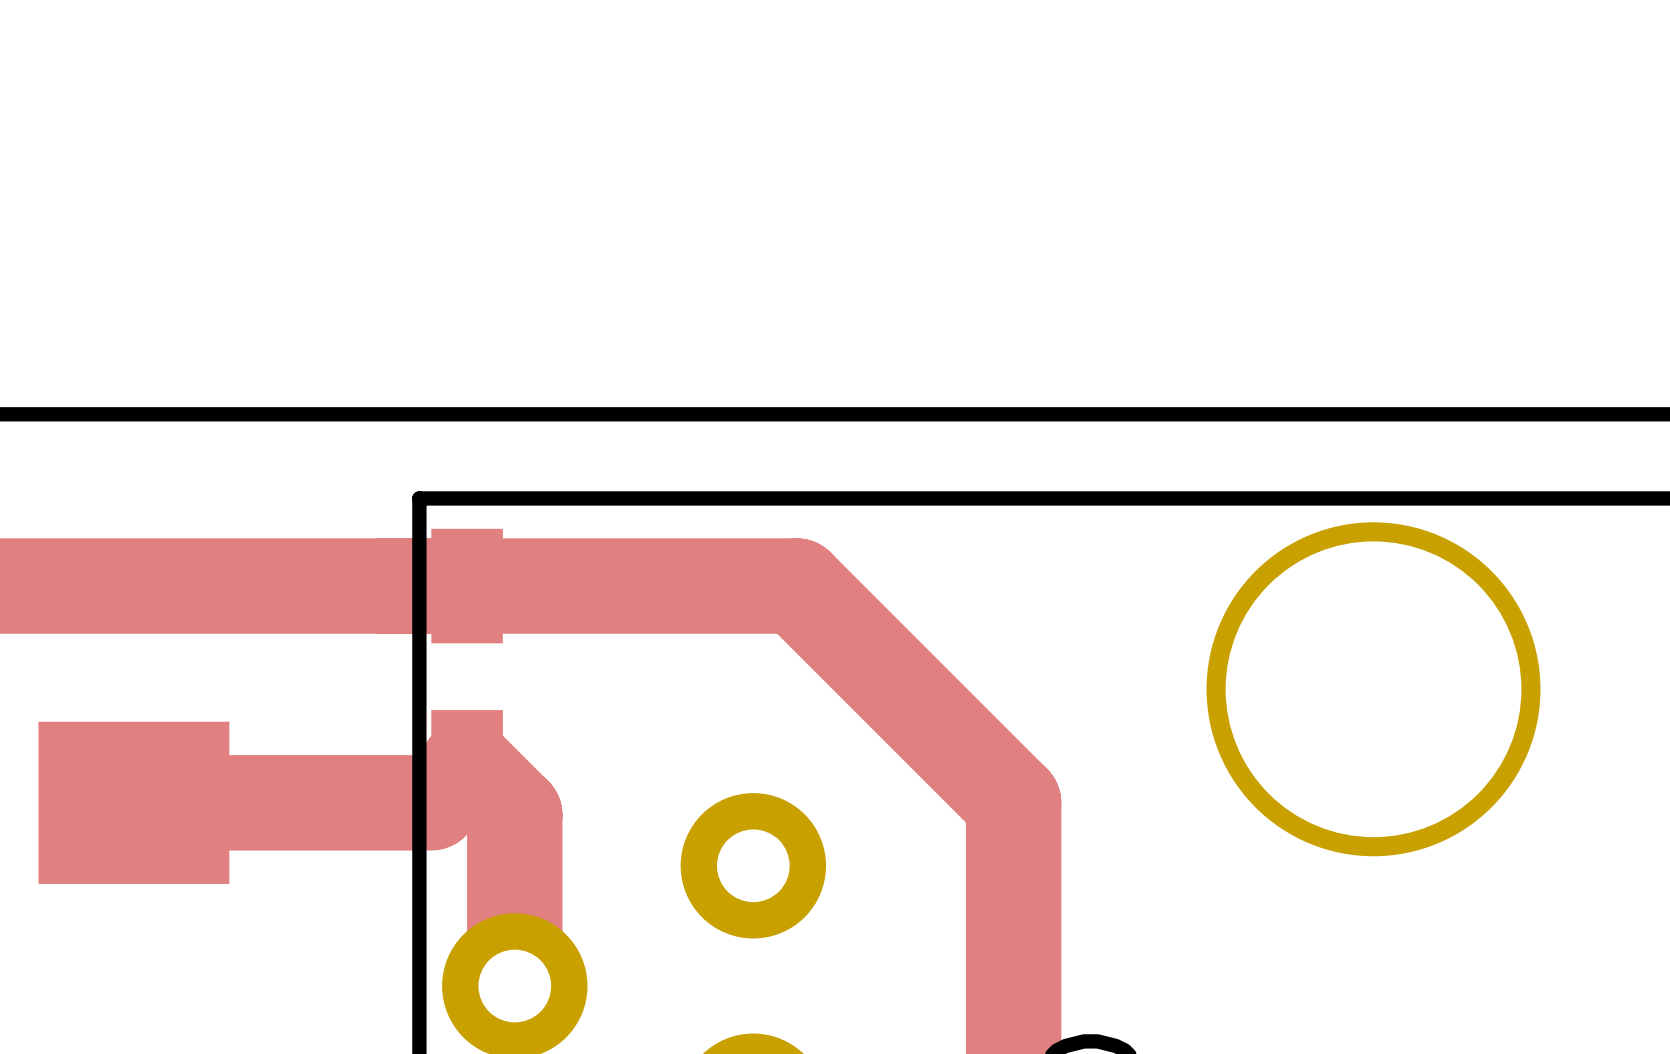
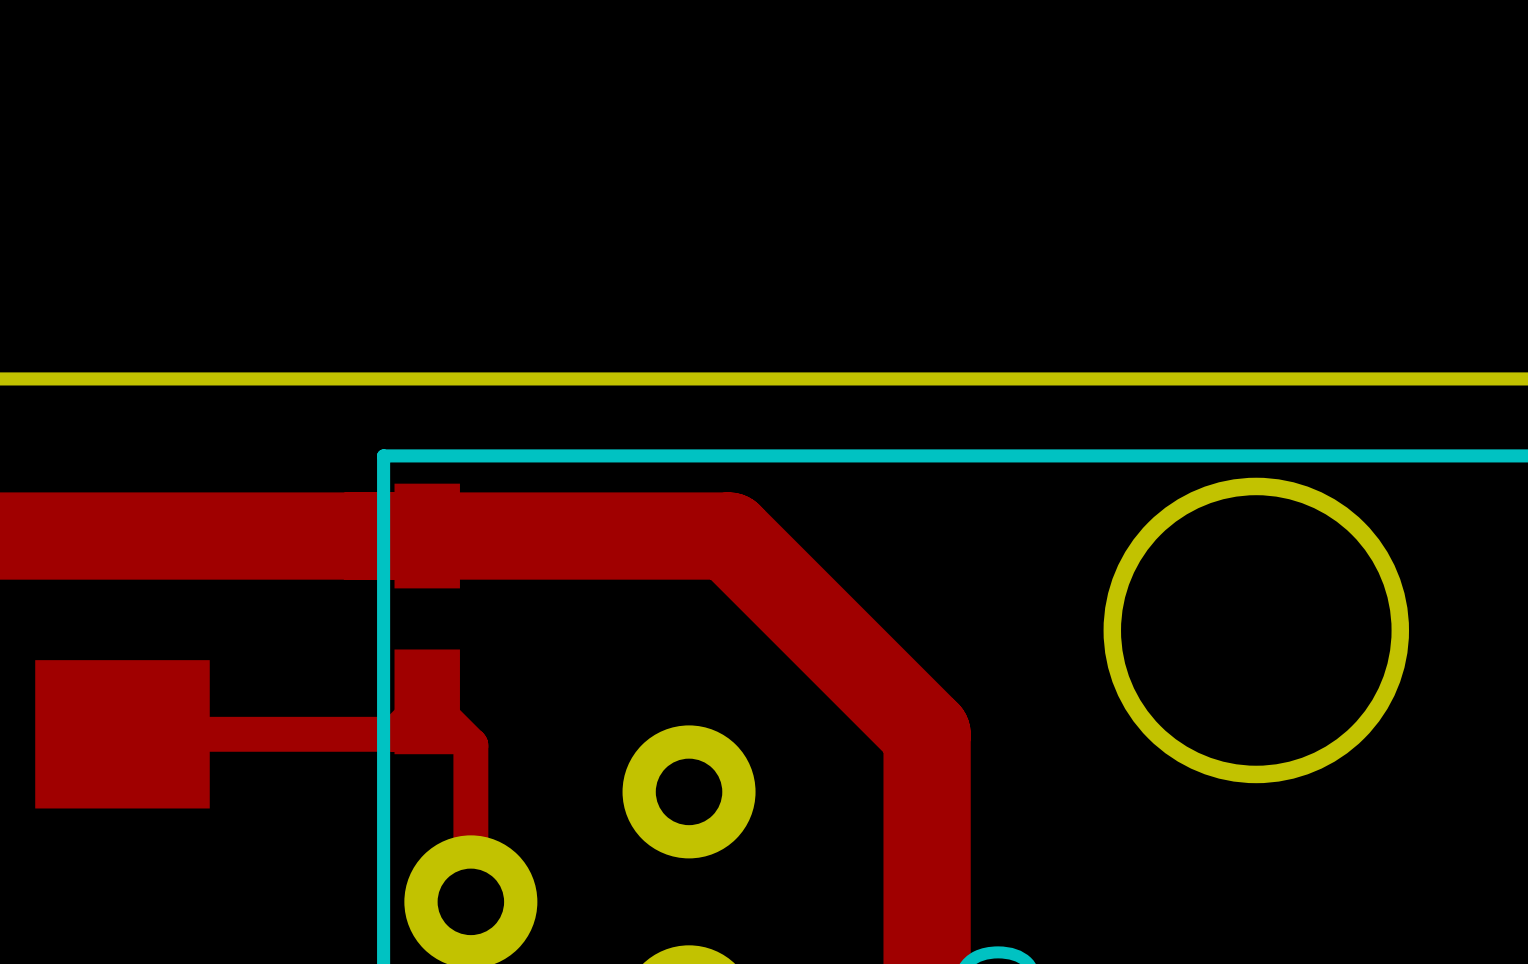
top track width: thick (467, 767) (514, 815) (514, 986) -> thin (427, 701) (470, 745) (470, 901)
top track width: thick (431, 802) (133, 802) -> thin (394, 734) (122, 734)

